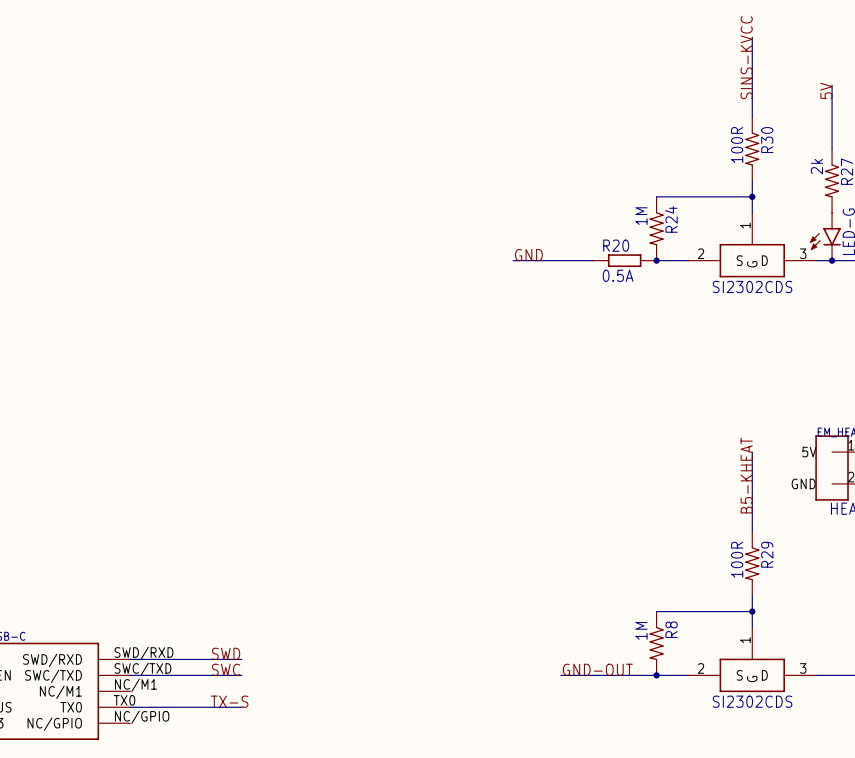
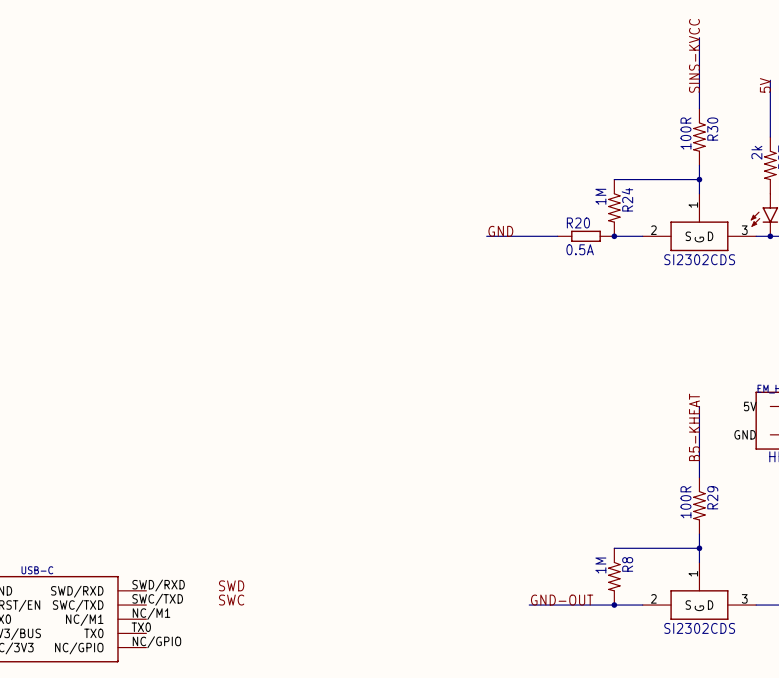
wire: (130, 659) (241, 659) -> none
wire: (130, 675) (241, 675) -> none
label: TX-S (229, 701) -> none
wire: (130, 707) (241, 707) -> none

